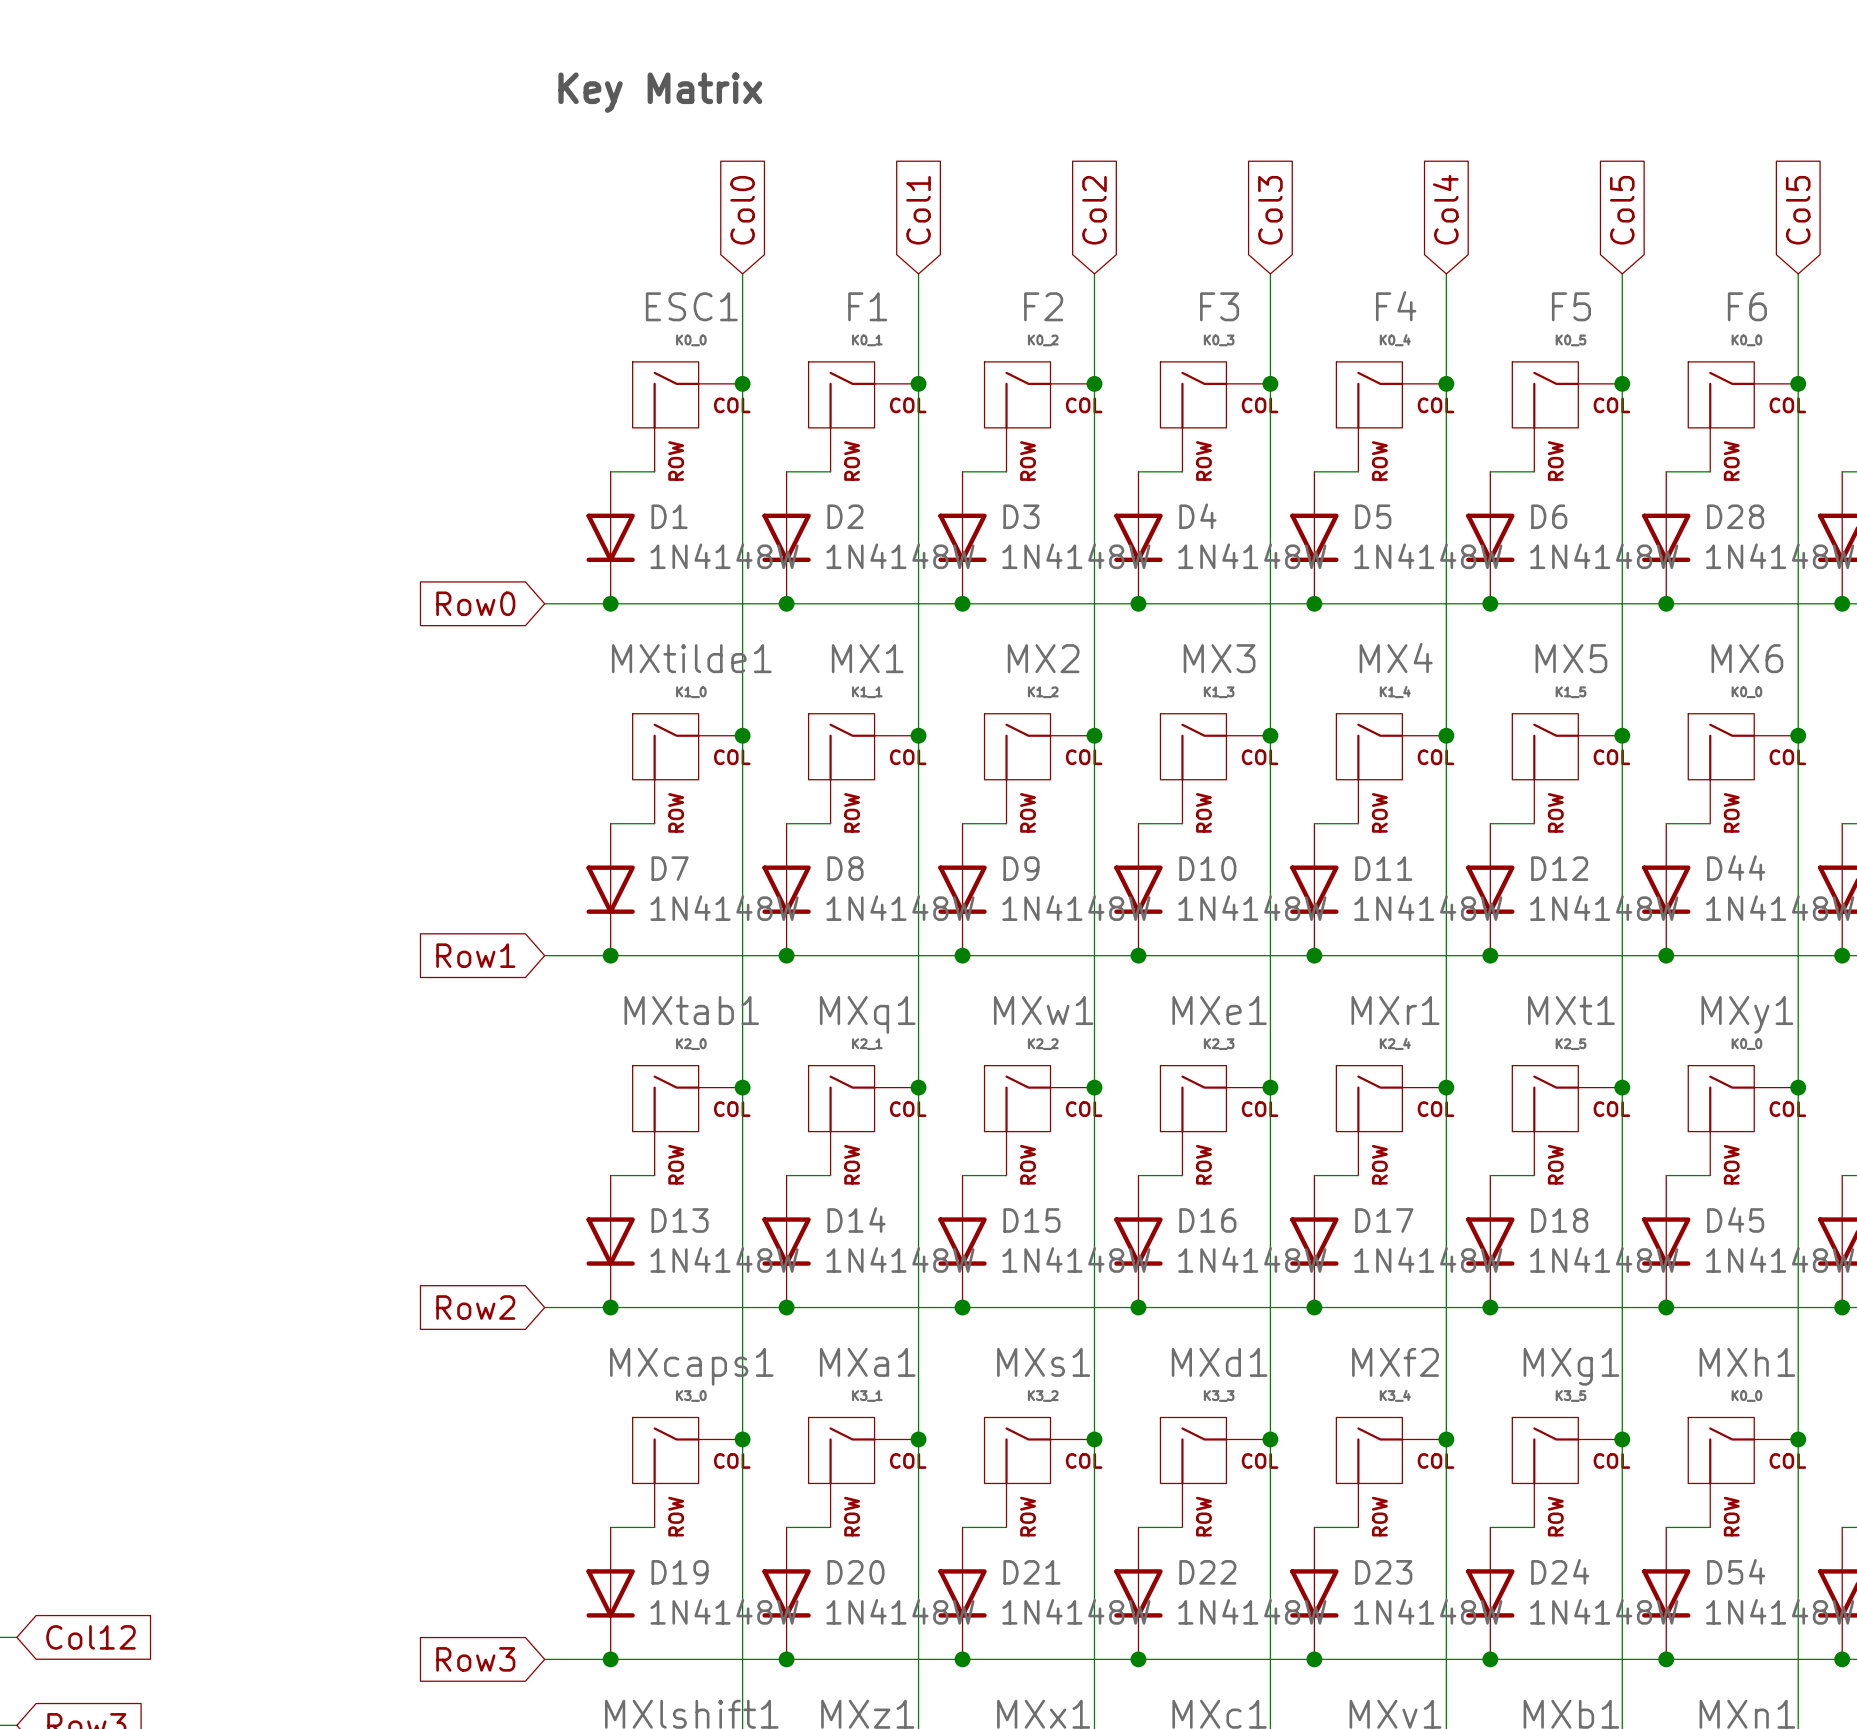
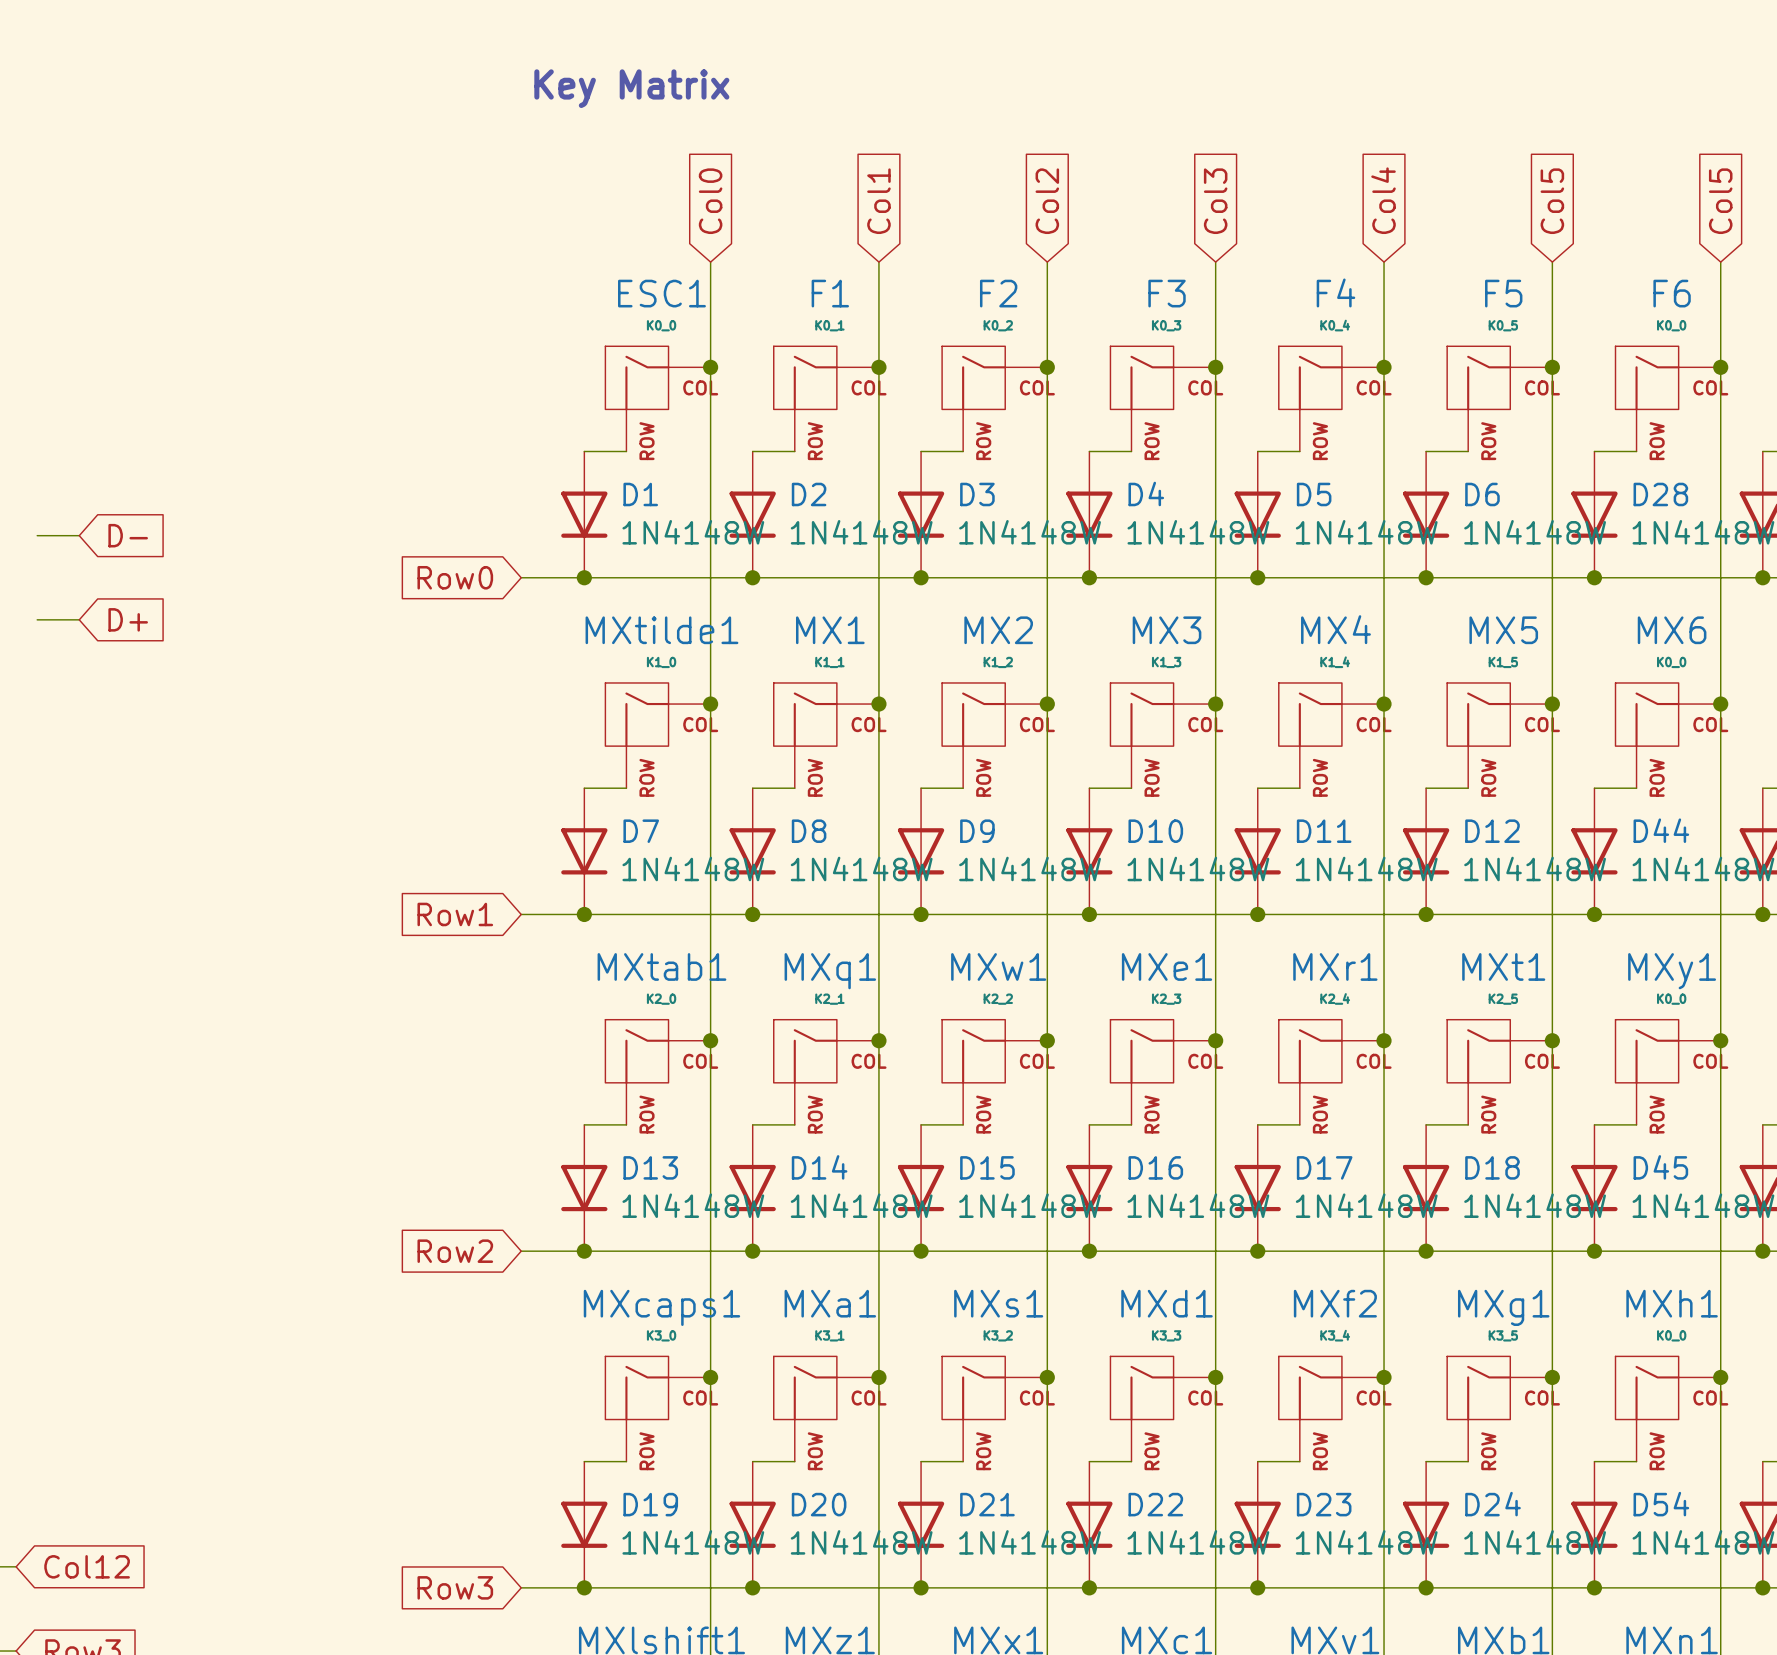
wire: none -> (37, 535) (79, 535)
global label: none -> D- (128, 535)
wire: none -> (37, 619) (79, 619)
global label: none -> D+ (128, 619)

